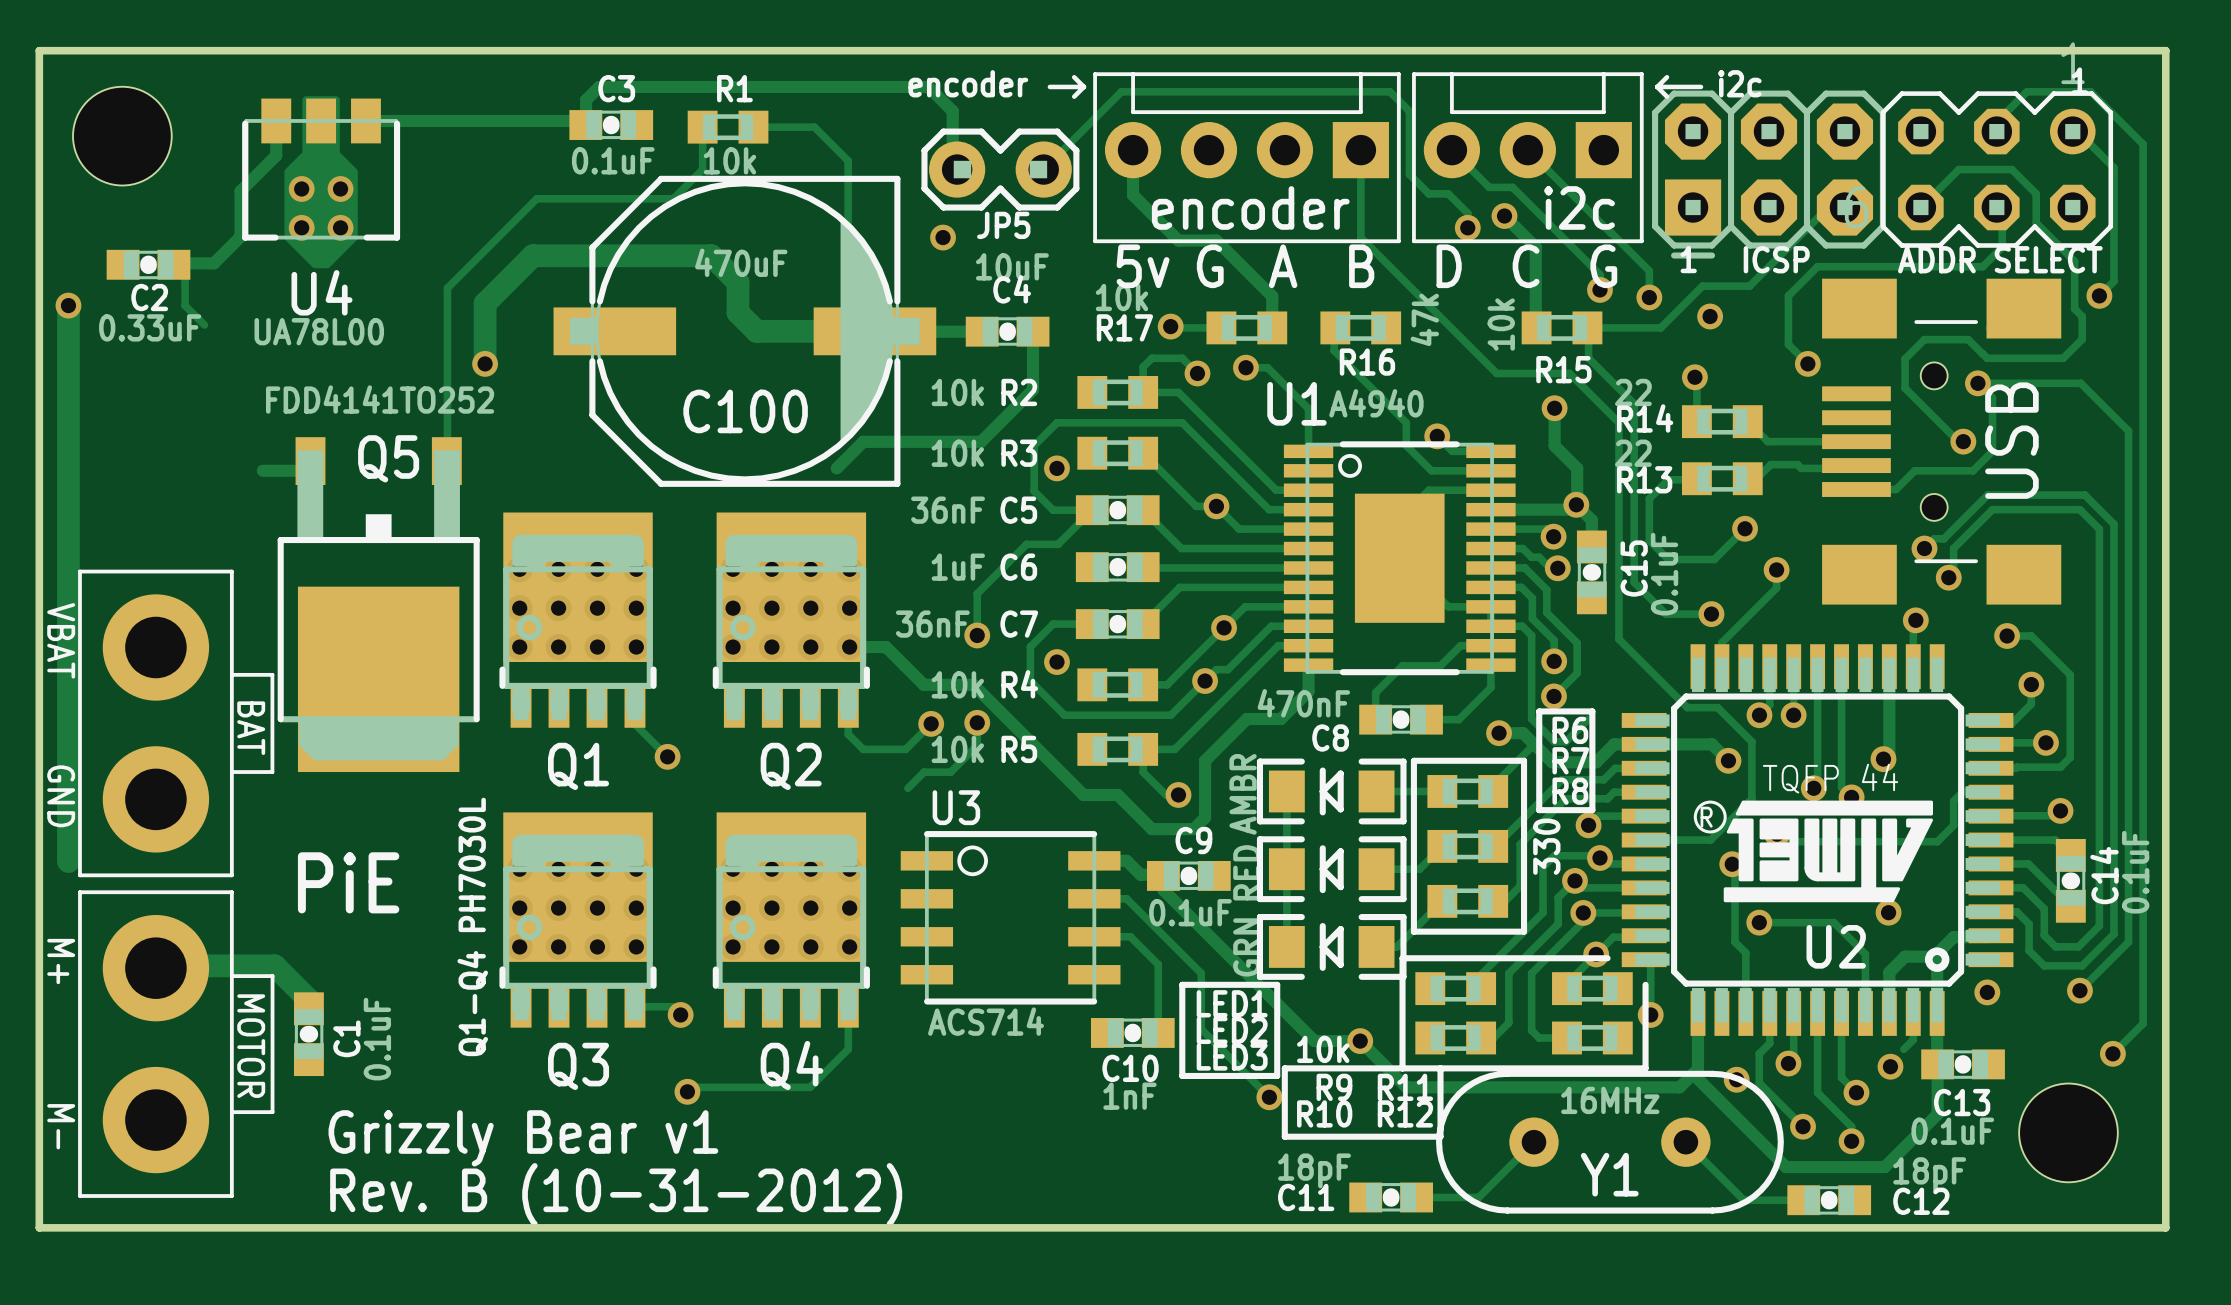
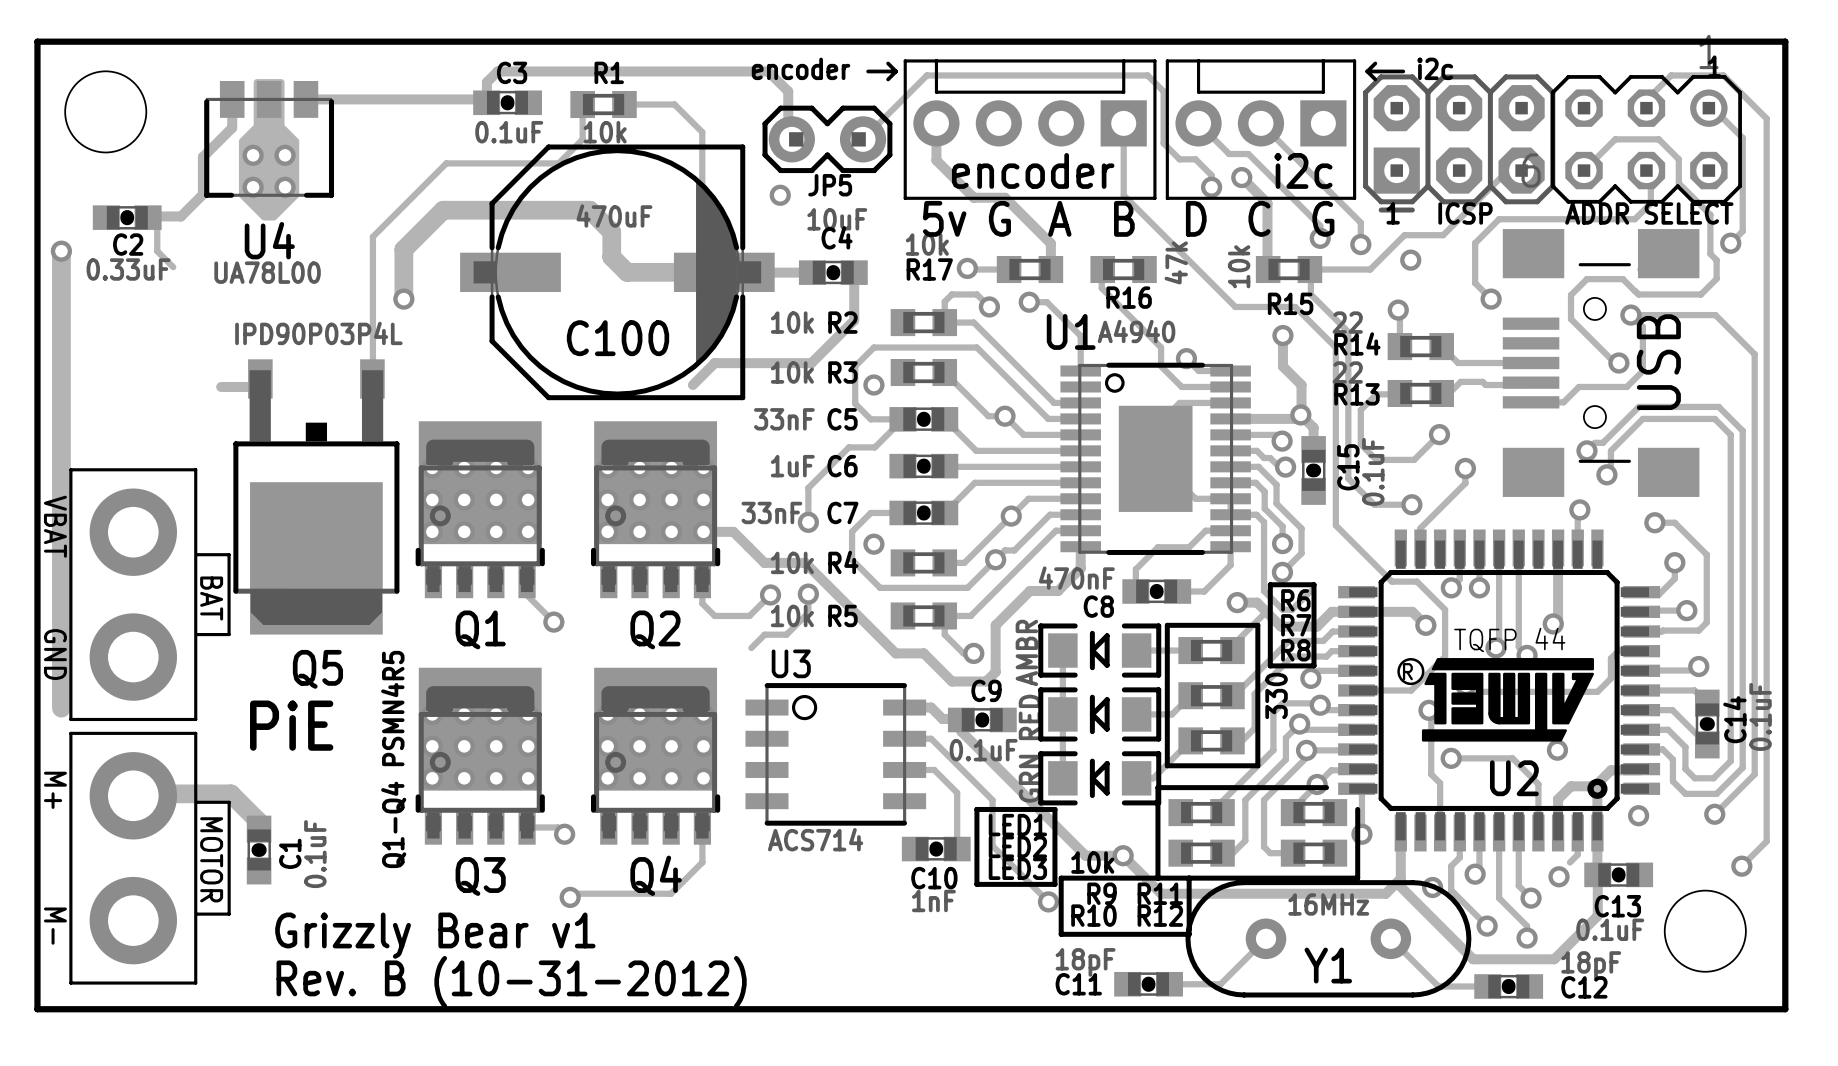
Q5 value: FDD4141TO252 (380, 399) -> IPD90P03P4L (318, 333)
Q5 name position: Q5 (388, 458) -> Q5 (317, 669)
C5 value: 36nF (948, 510) -> 33nF (784, 419)
C7 value: 36nF (932, 624) -> 33nF (771, 512)
text: Q1-Q4 PH7030L (472, 926) -> Q1-Q4 PSMN4R5 (393, 759)

